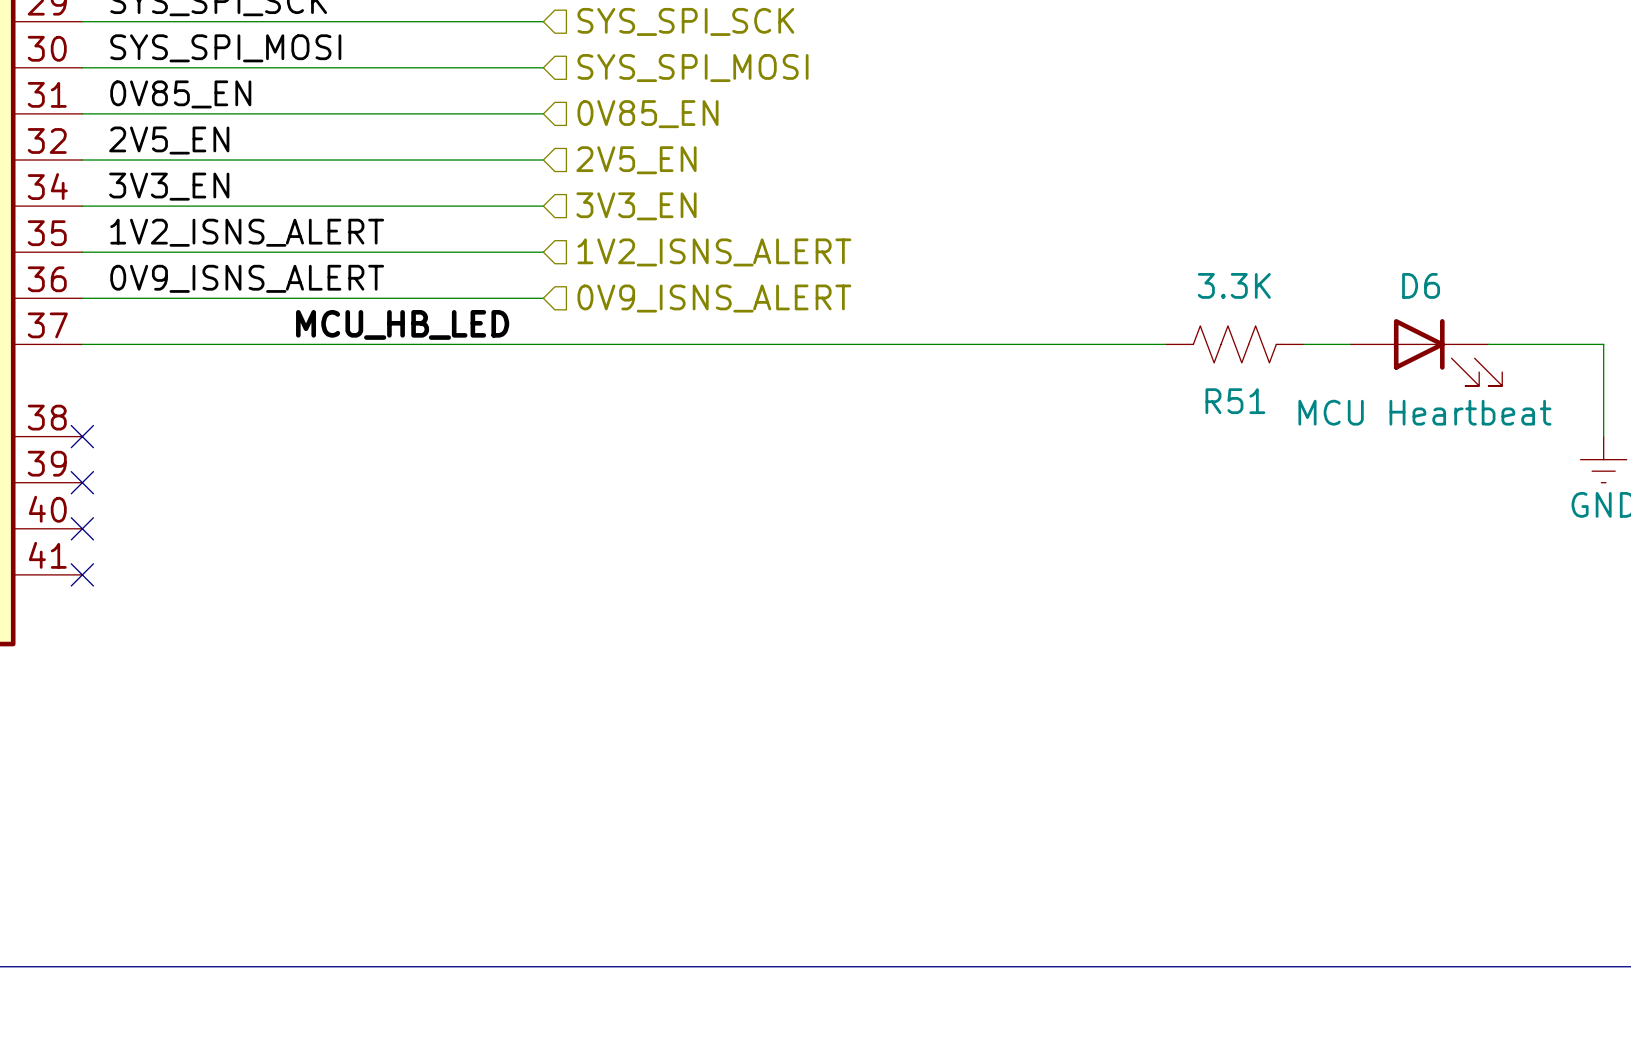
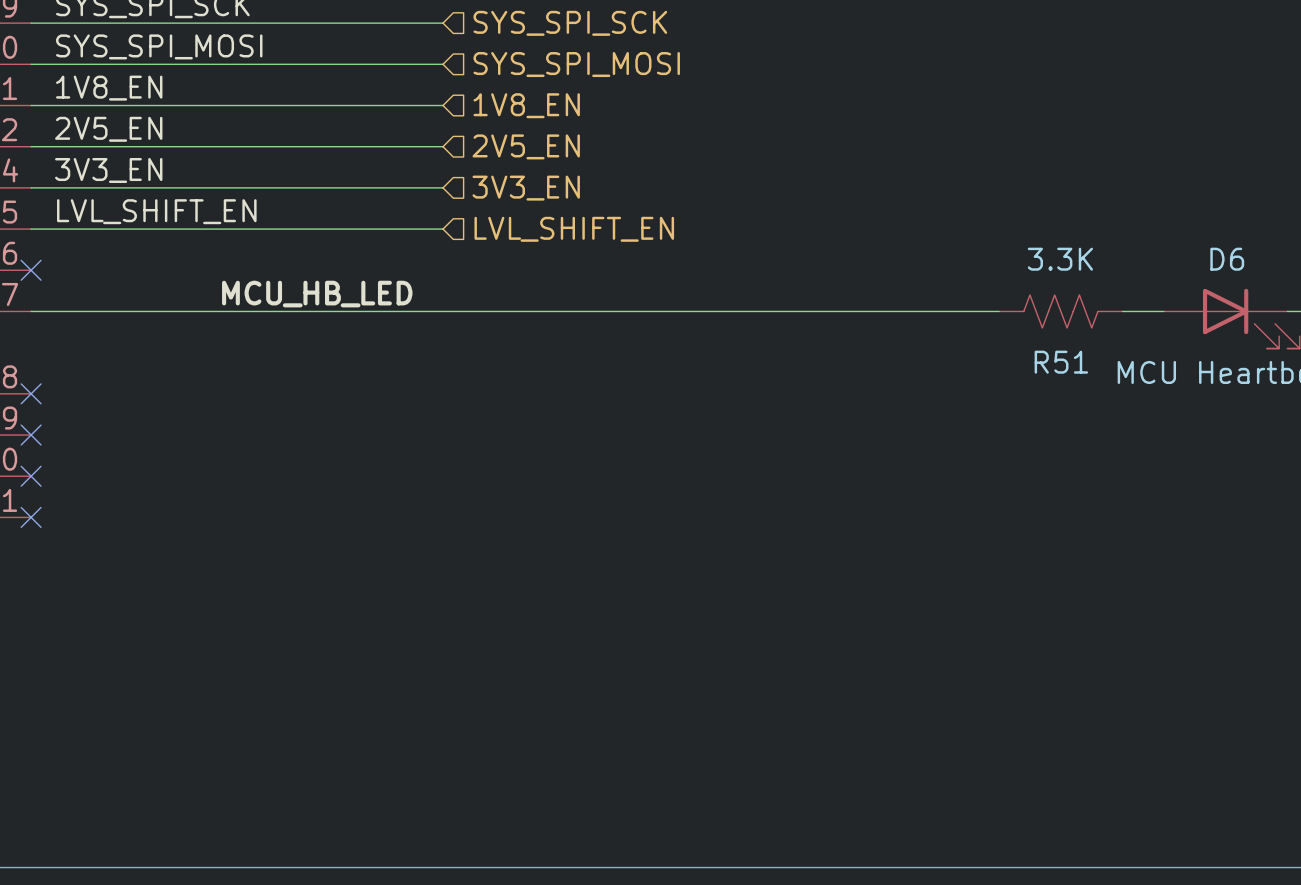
label: 0V85_EN (180, 94) -> 1V8_EN (109, 88)
hierarchical label: 0V85_EN (647, 114) -> 1V8_EN (526, 105)
label: 1V2_ISNS_ALERT (247, 232) -> LVL_SHIFT_EN (156, 211)
hierarchical label: 1V2_ISNS_ALERT (714, 252) -> LVL_SHIFT_EN (574, 229)
label: 0V9_ISNS_ALERT (247, 278) -> none
wire: (82, 298) (543, 298) -> none
no-connect mark: none -> (31, 270)
hierarchical label: 0V9_ISNS_ALERT (714, 298) -> none

